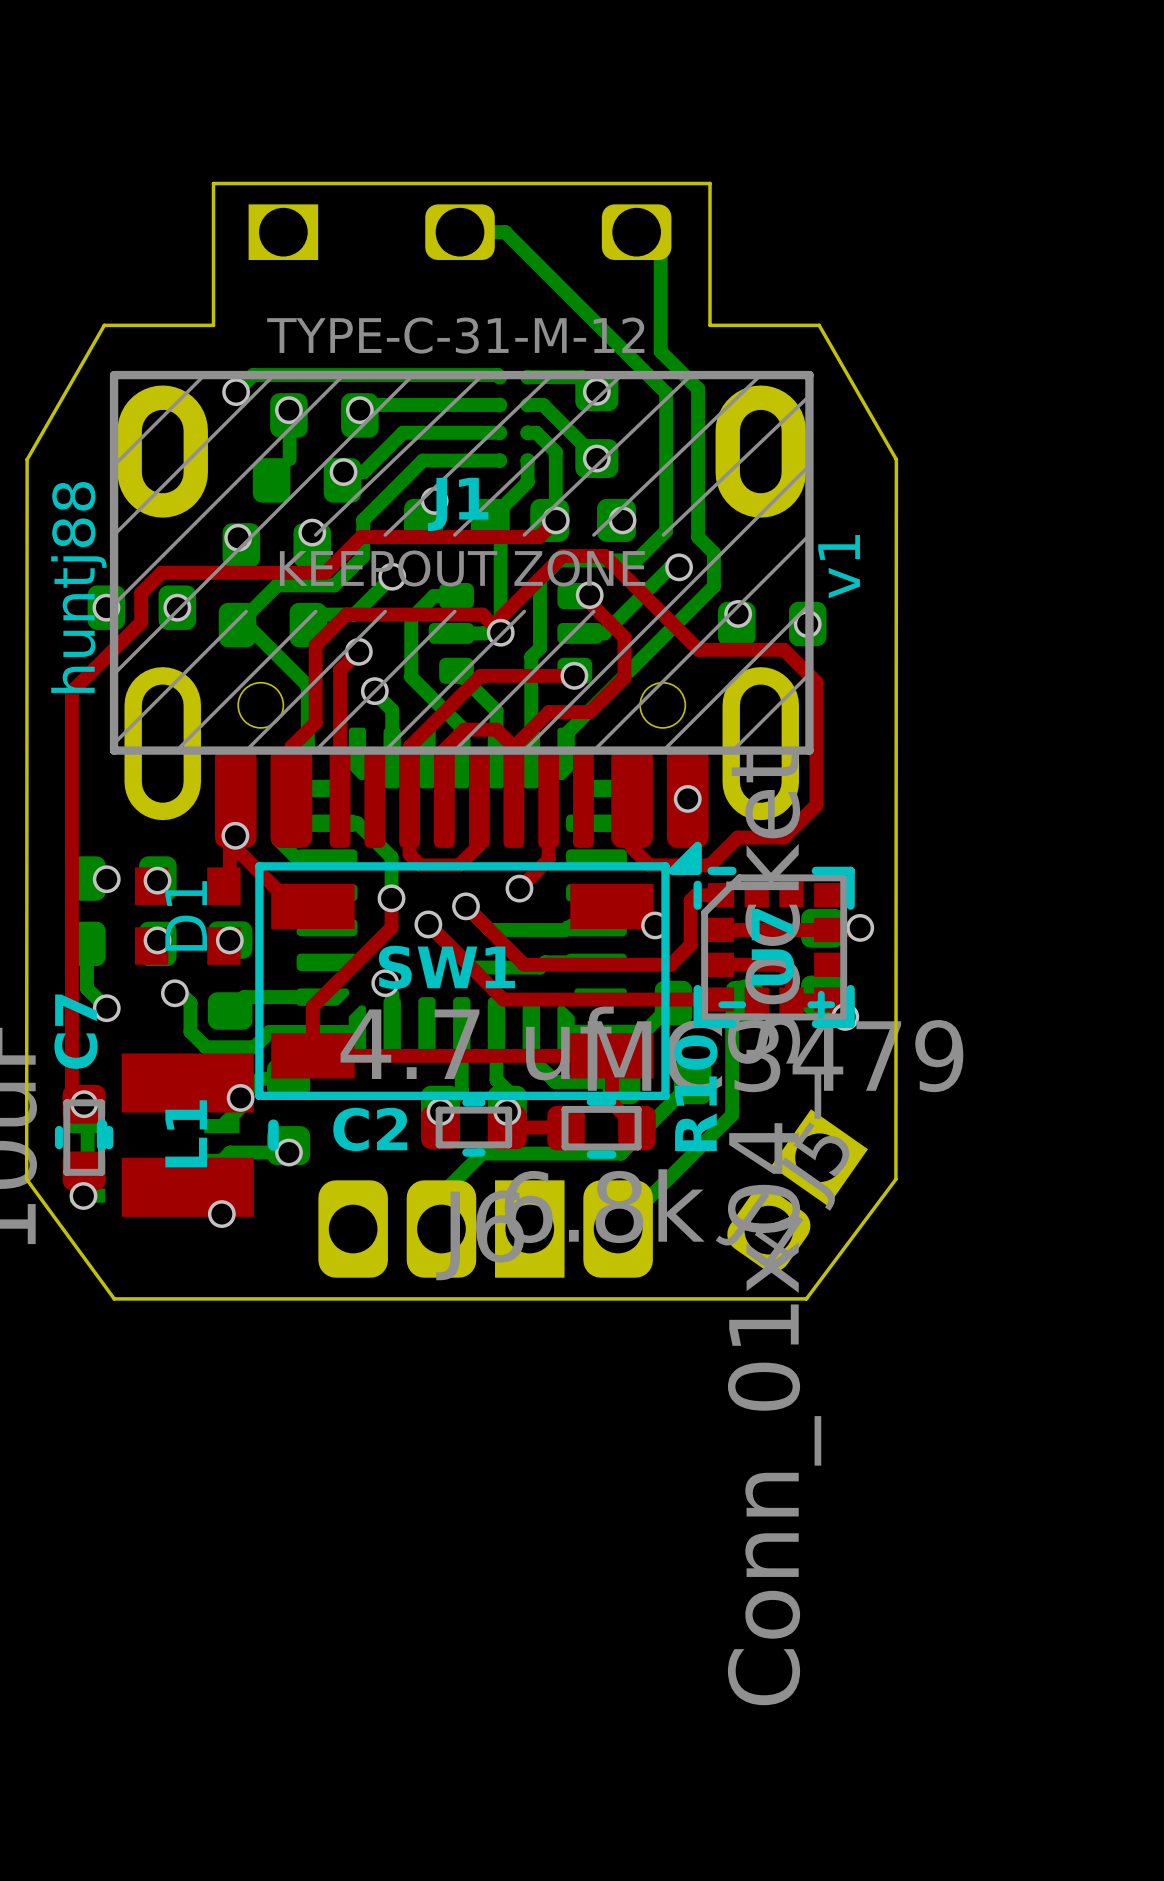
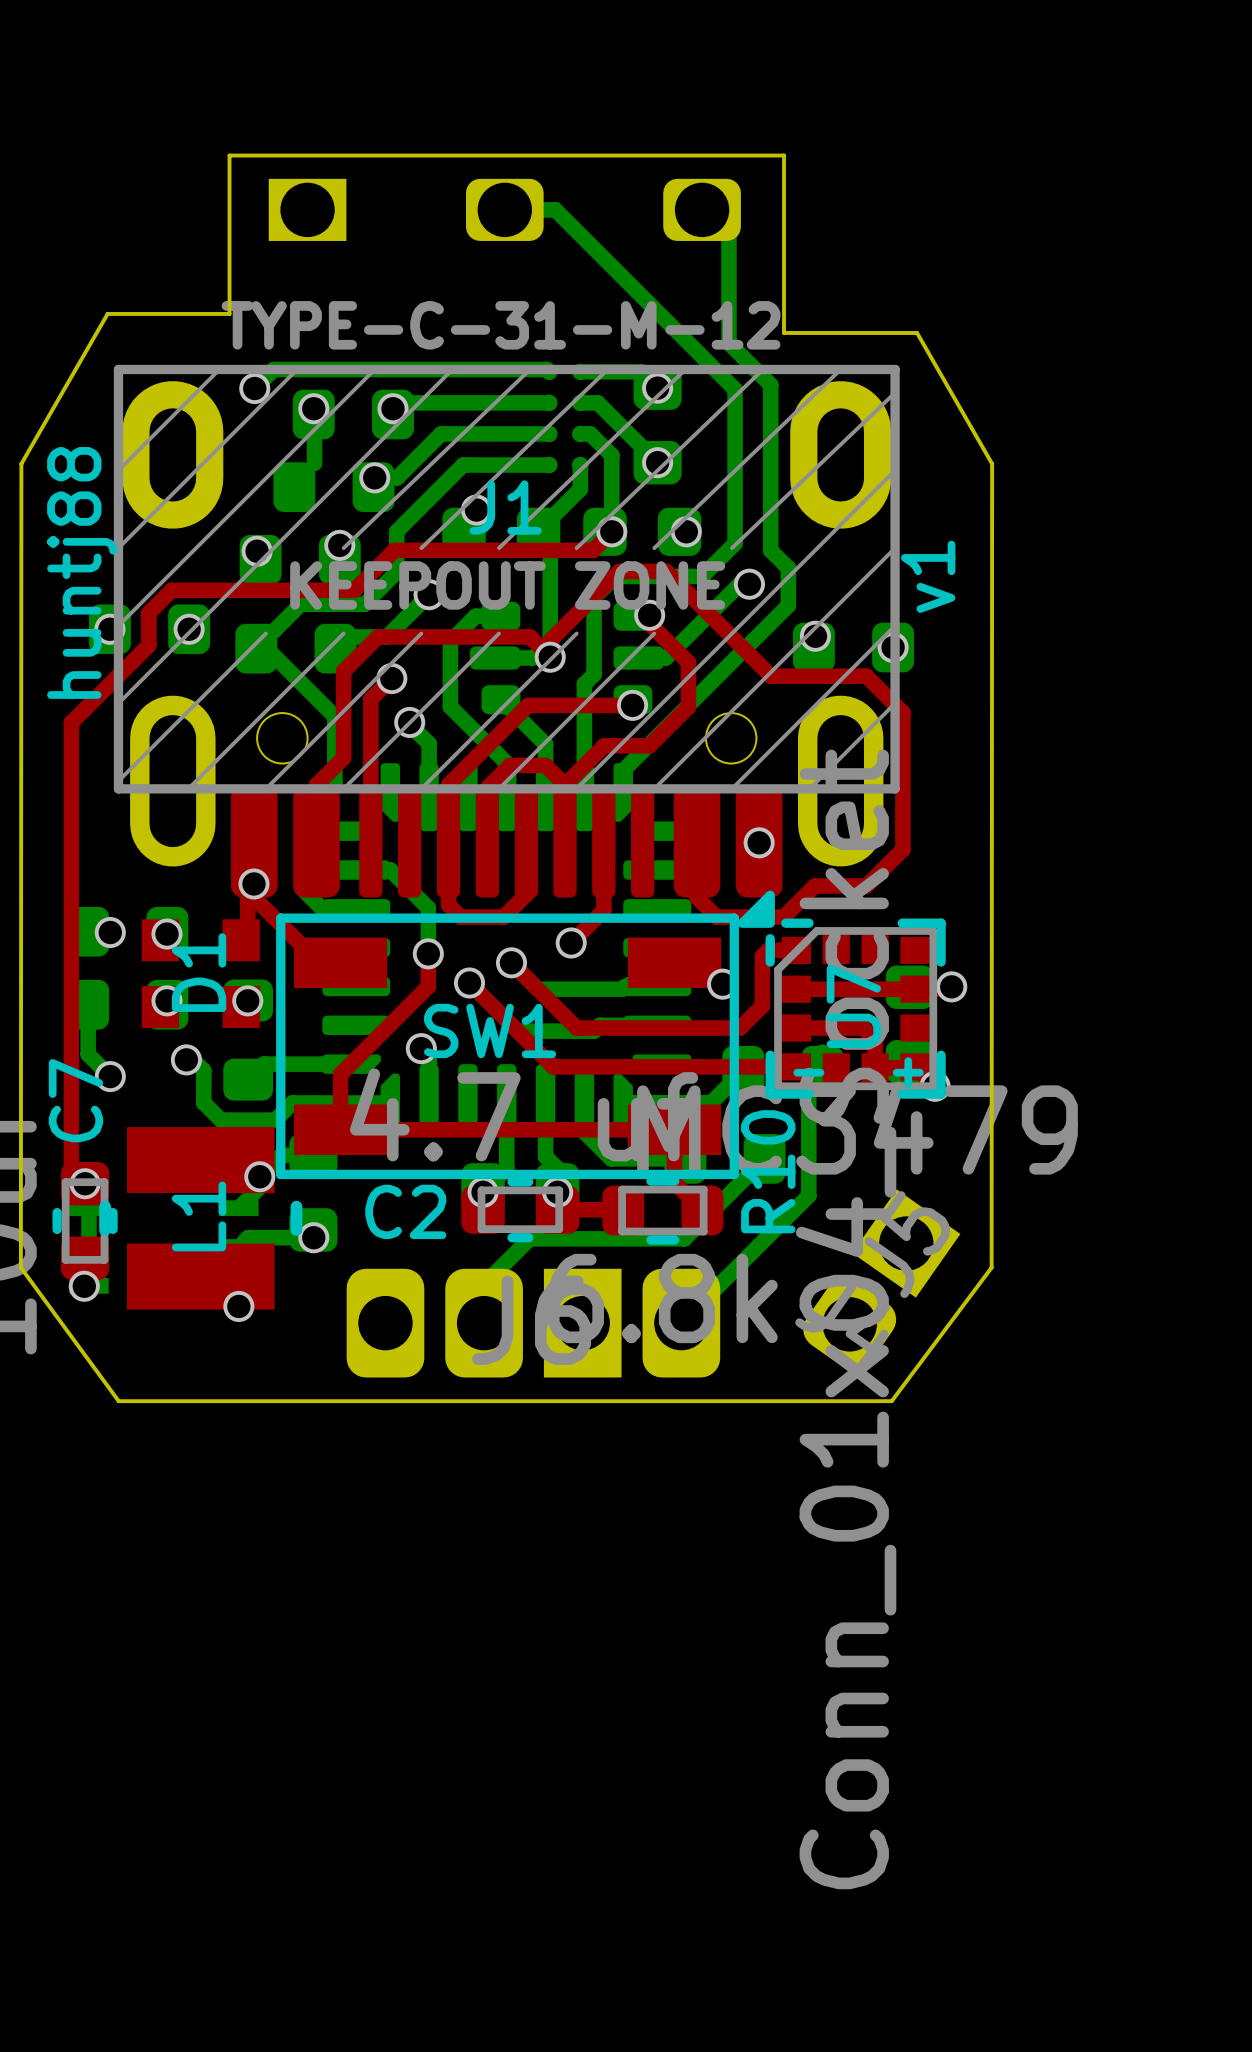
board edge: (710, 325) (819, 325) (896, 459) -> (784, 313) (784, 332) (917, 332) (992, 463)
text position: huntj88 (78, 587) -> huntj88 (82, 572)

